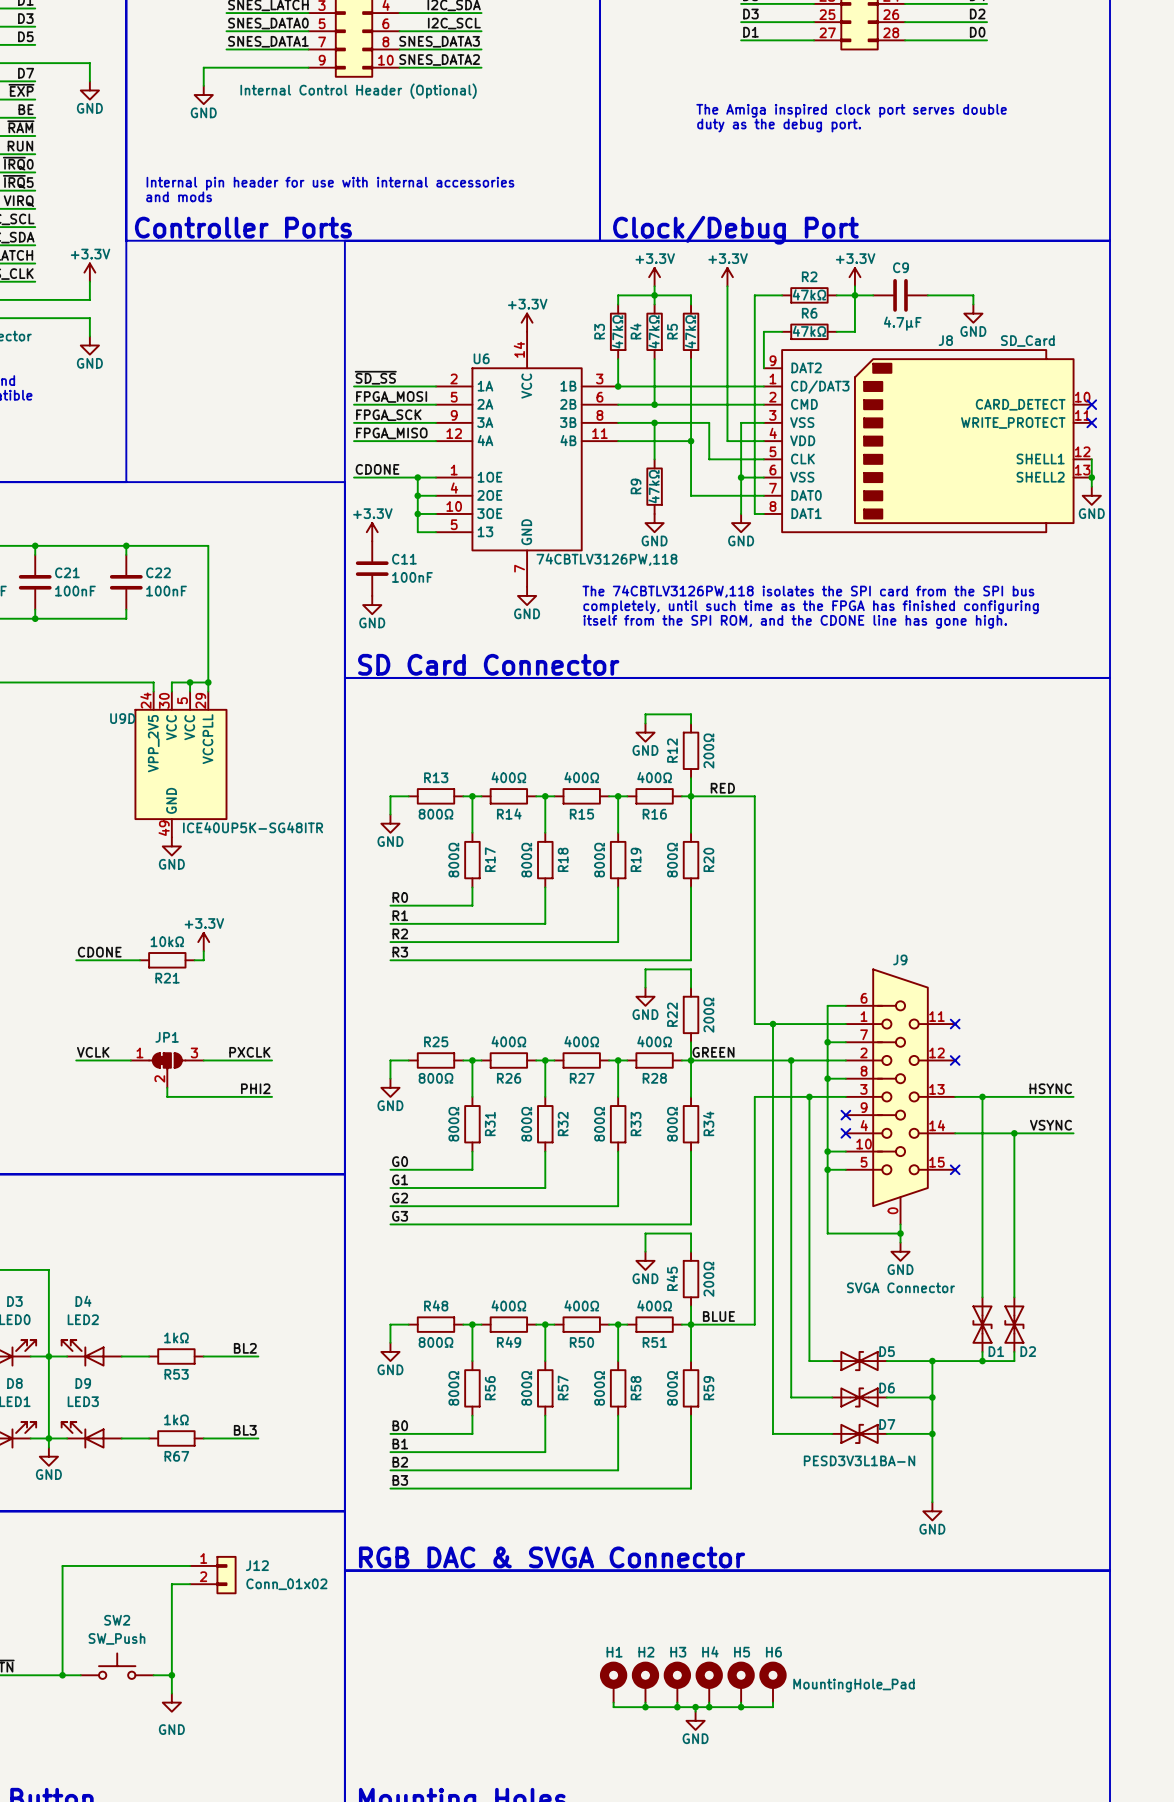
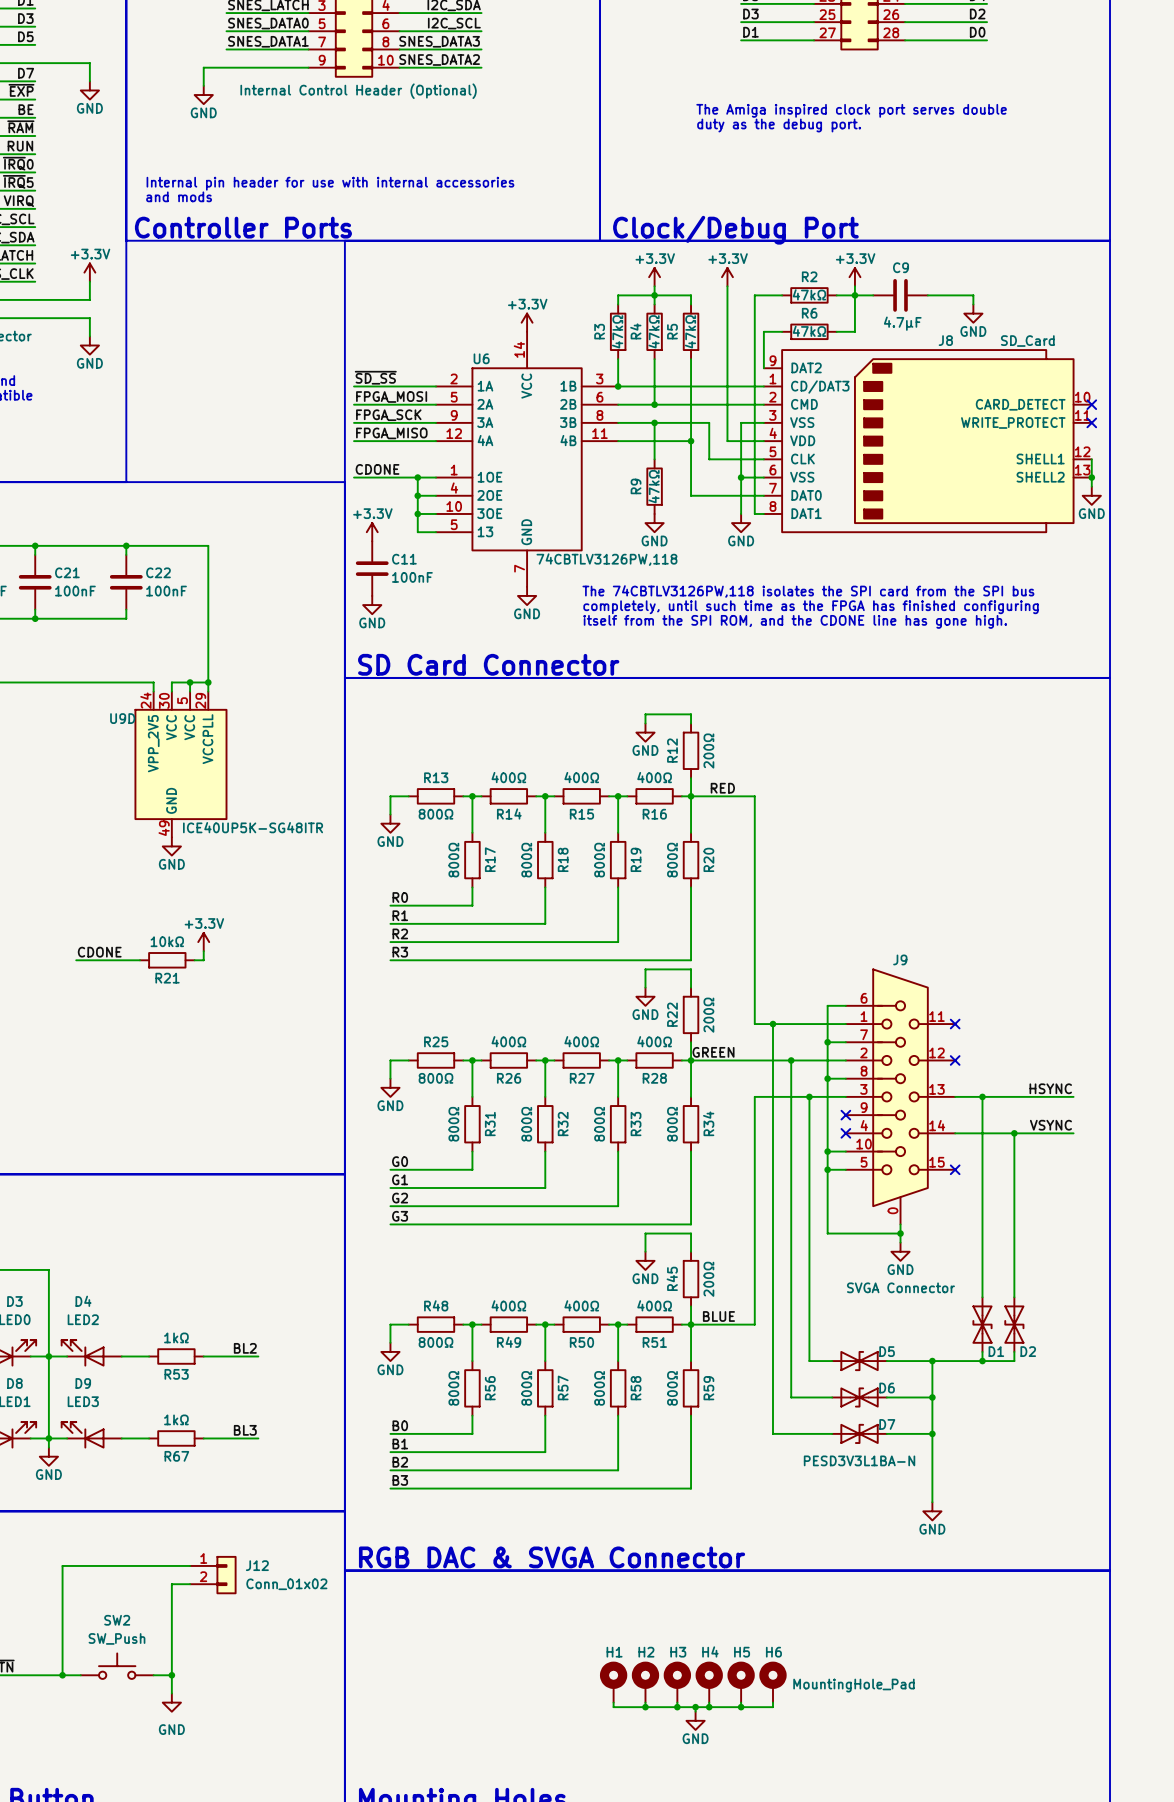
label: VCLK (93, 1052) -> none
label: PXCLK (249, 1052) -> none
wire: (76, 1060) (130, 1060) -> none
wire: (203, 1060) (272, 1060) -> none
JP1: (167, 1070) -> none
wire: (167, 1087) (167, 1096) (272, 1096) -> none
label: PHI2 (255, 1088) -> none

